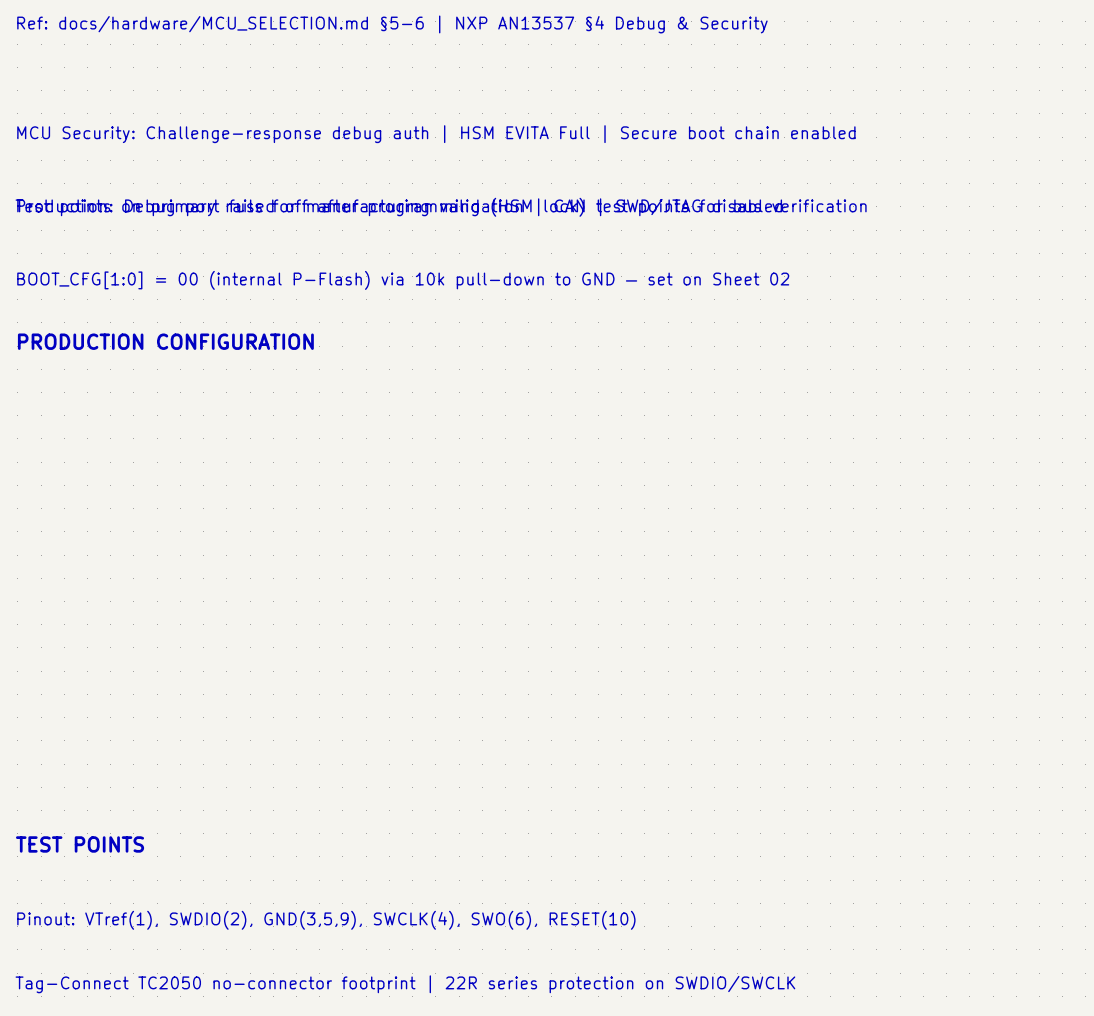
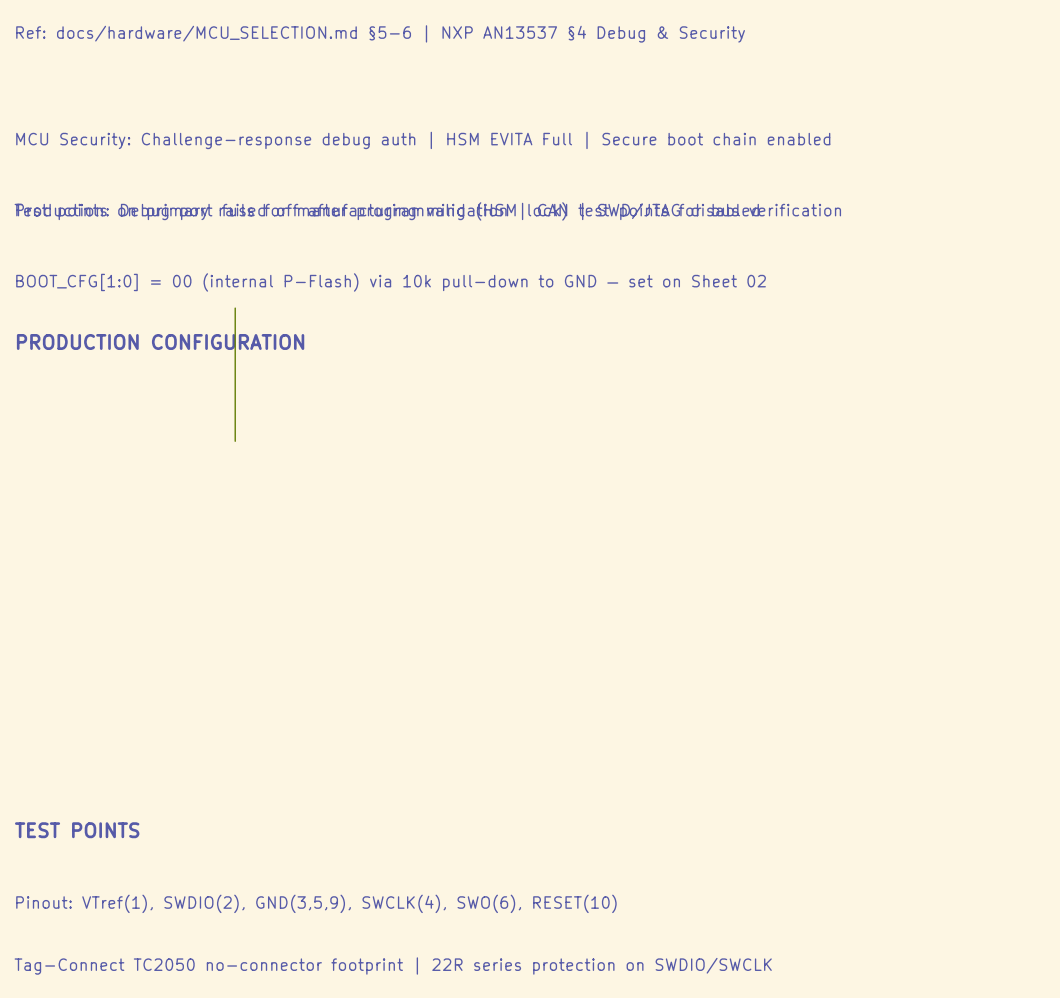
wire: none -> (235, 308) (235, 441)

